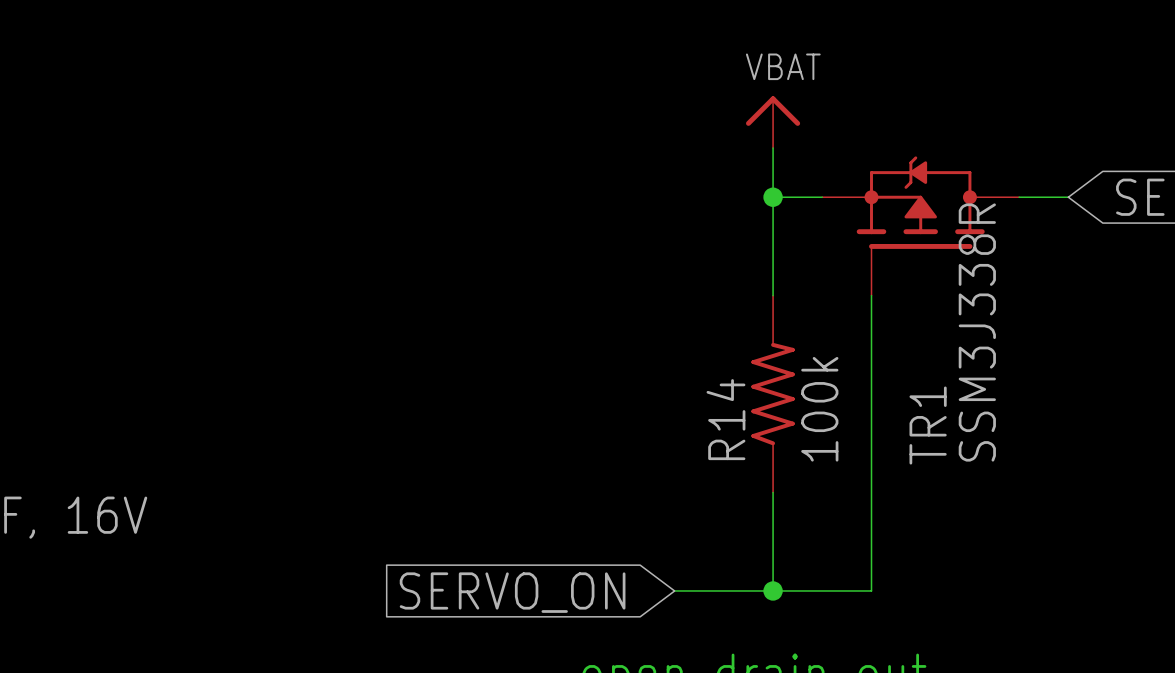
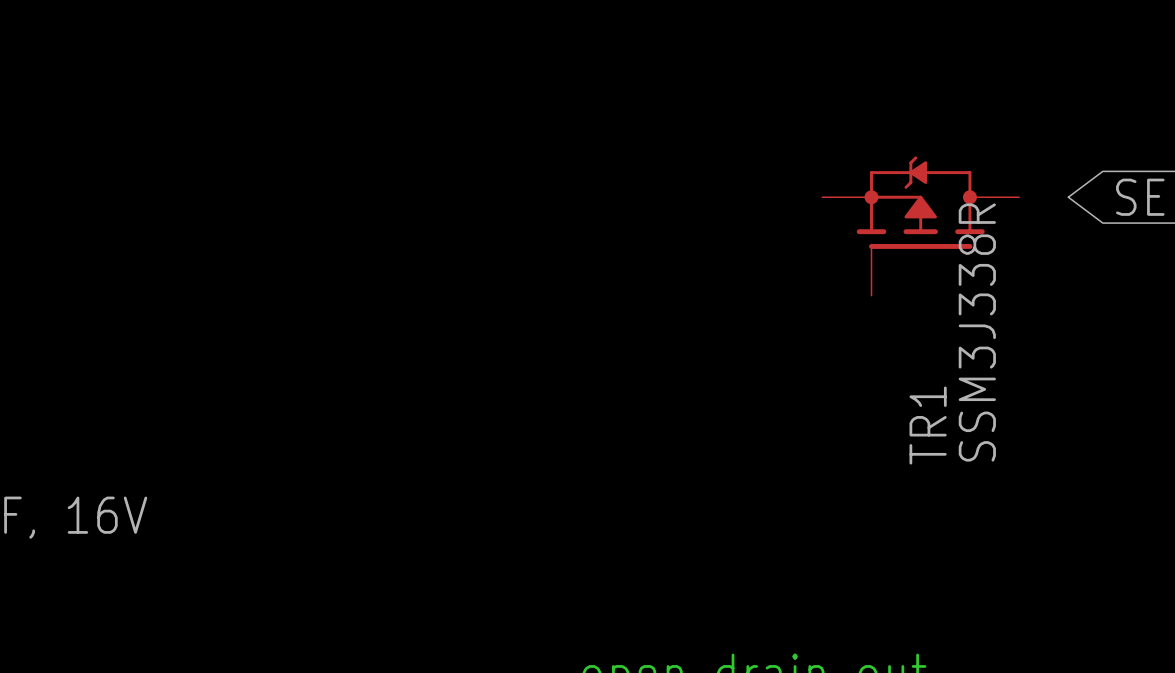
power symbol: VBAT (773, 122) -> none
wire: (773, 148) (773, 295) -> none
wire: (773, 197) (822, 197) -> none
junction: (773, 197) -> none
wire: (1019, 197) (1068, 197) -> none
wire: (871, 295) (871, 590) (674, 590) -> none
R14: 100k (773, 394) -> none
wire: (773, 492) (773, 590) -> none
junction: (773, 590) -> none
global label: SERVO_ON (512, 592) -> none

